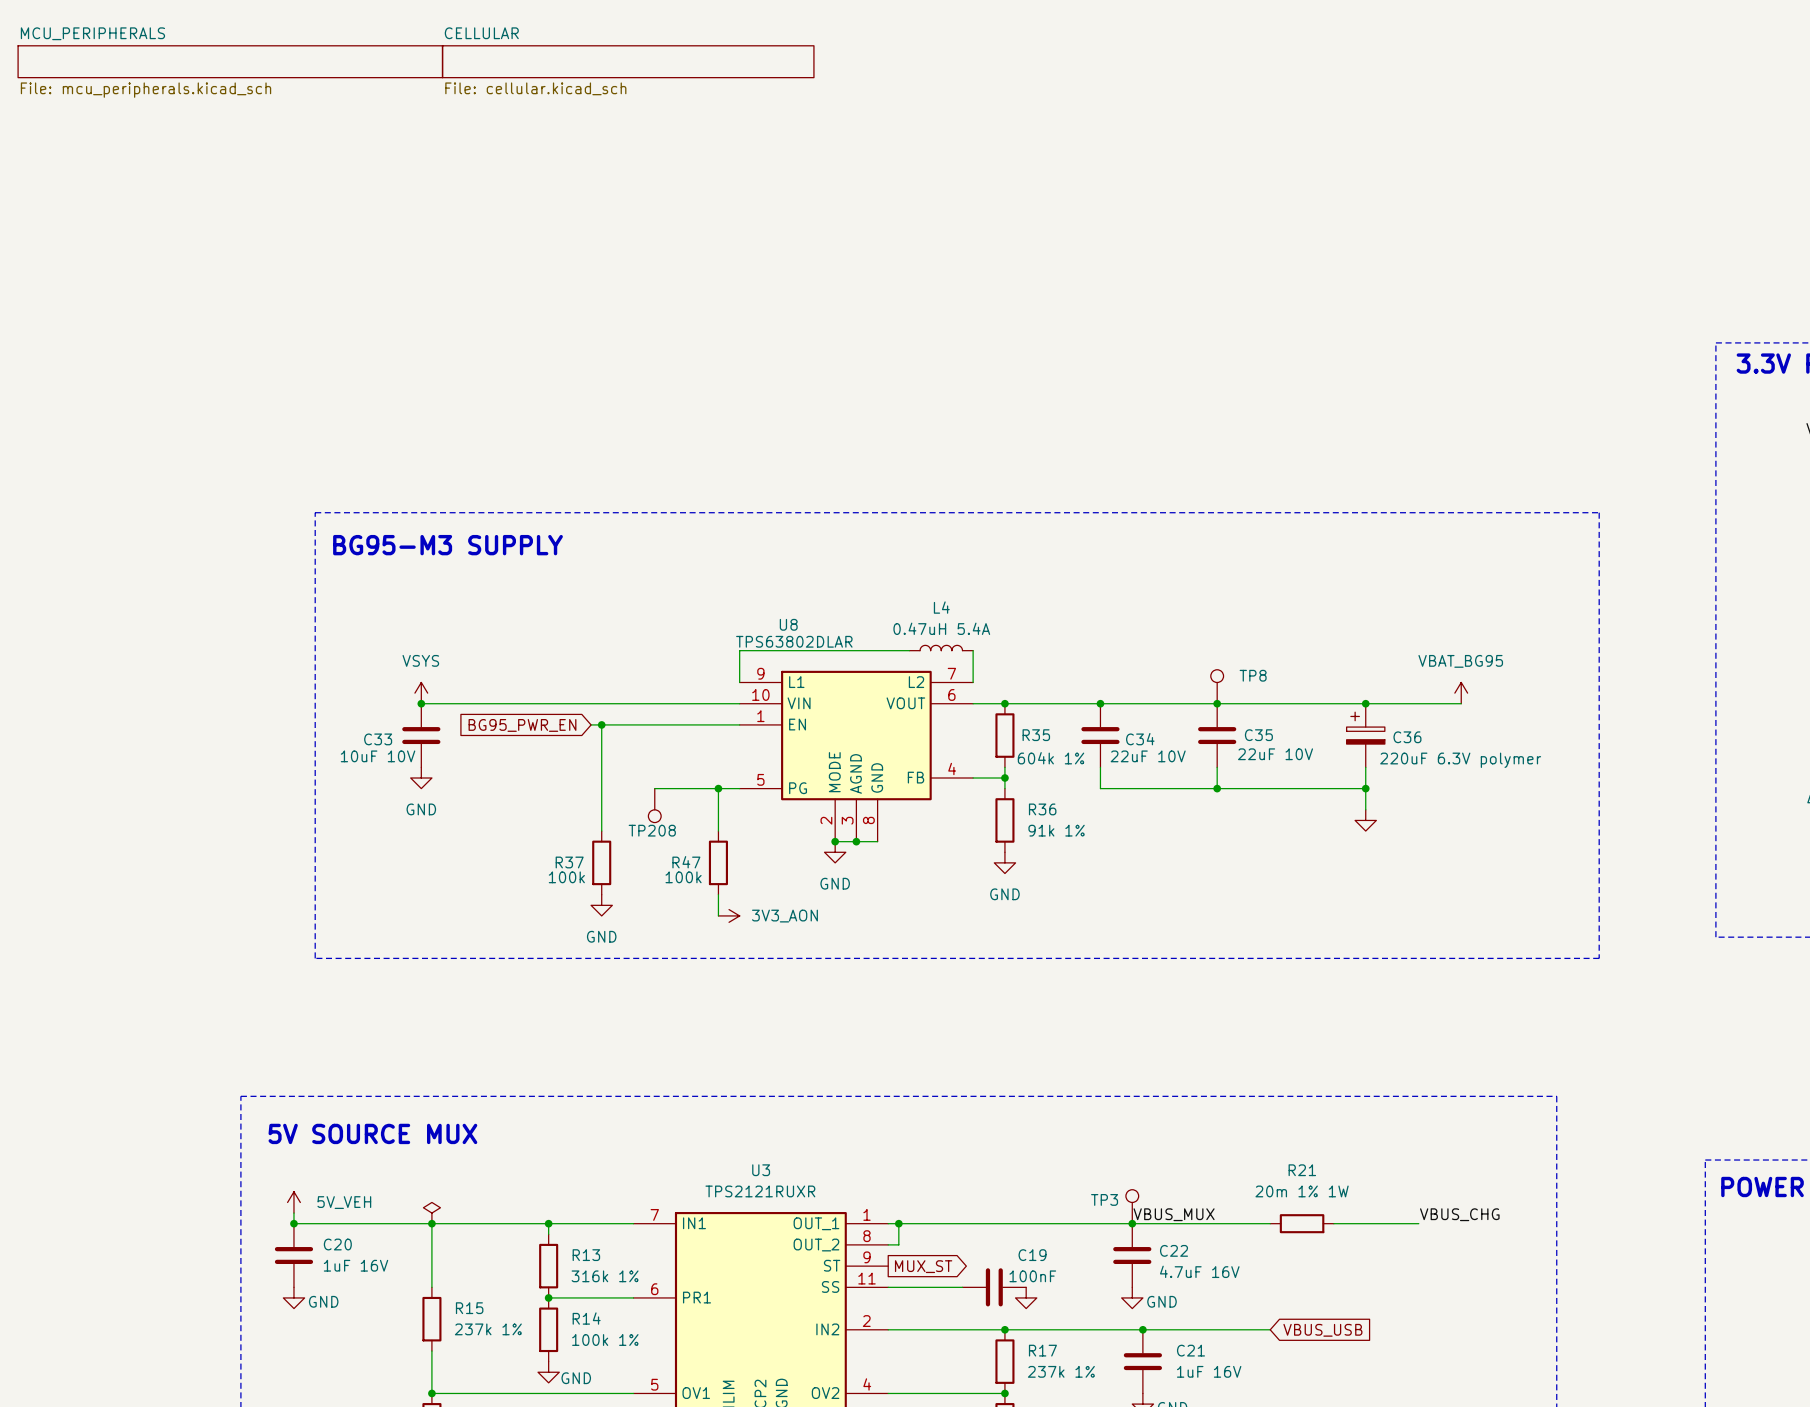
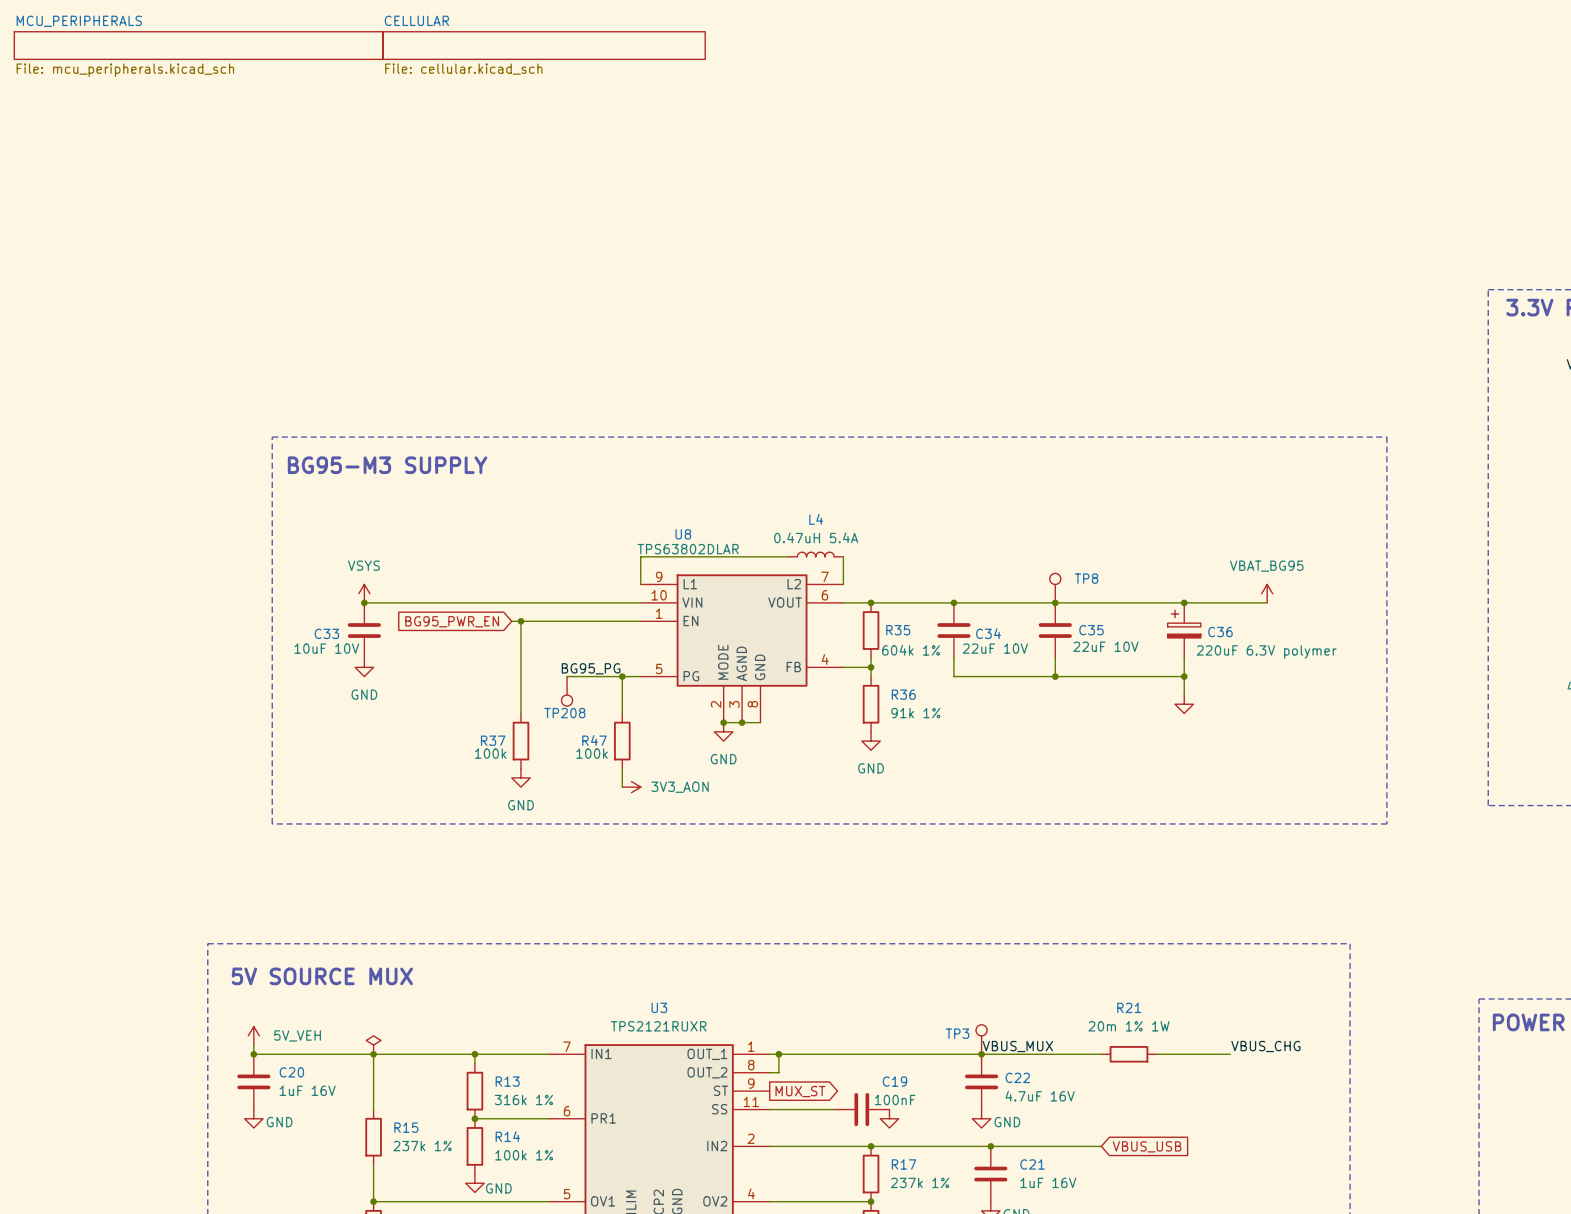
label: none -> BG95_PG (591, 668)

